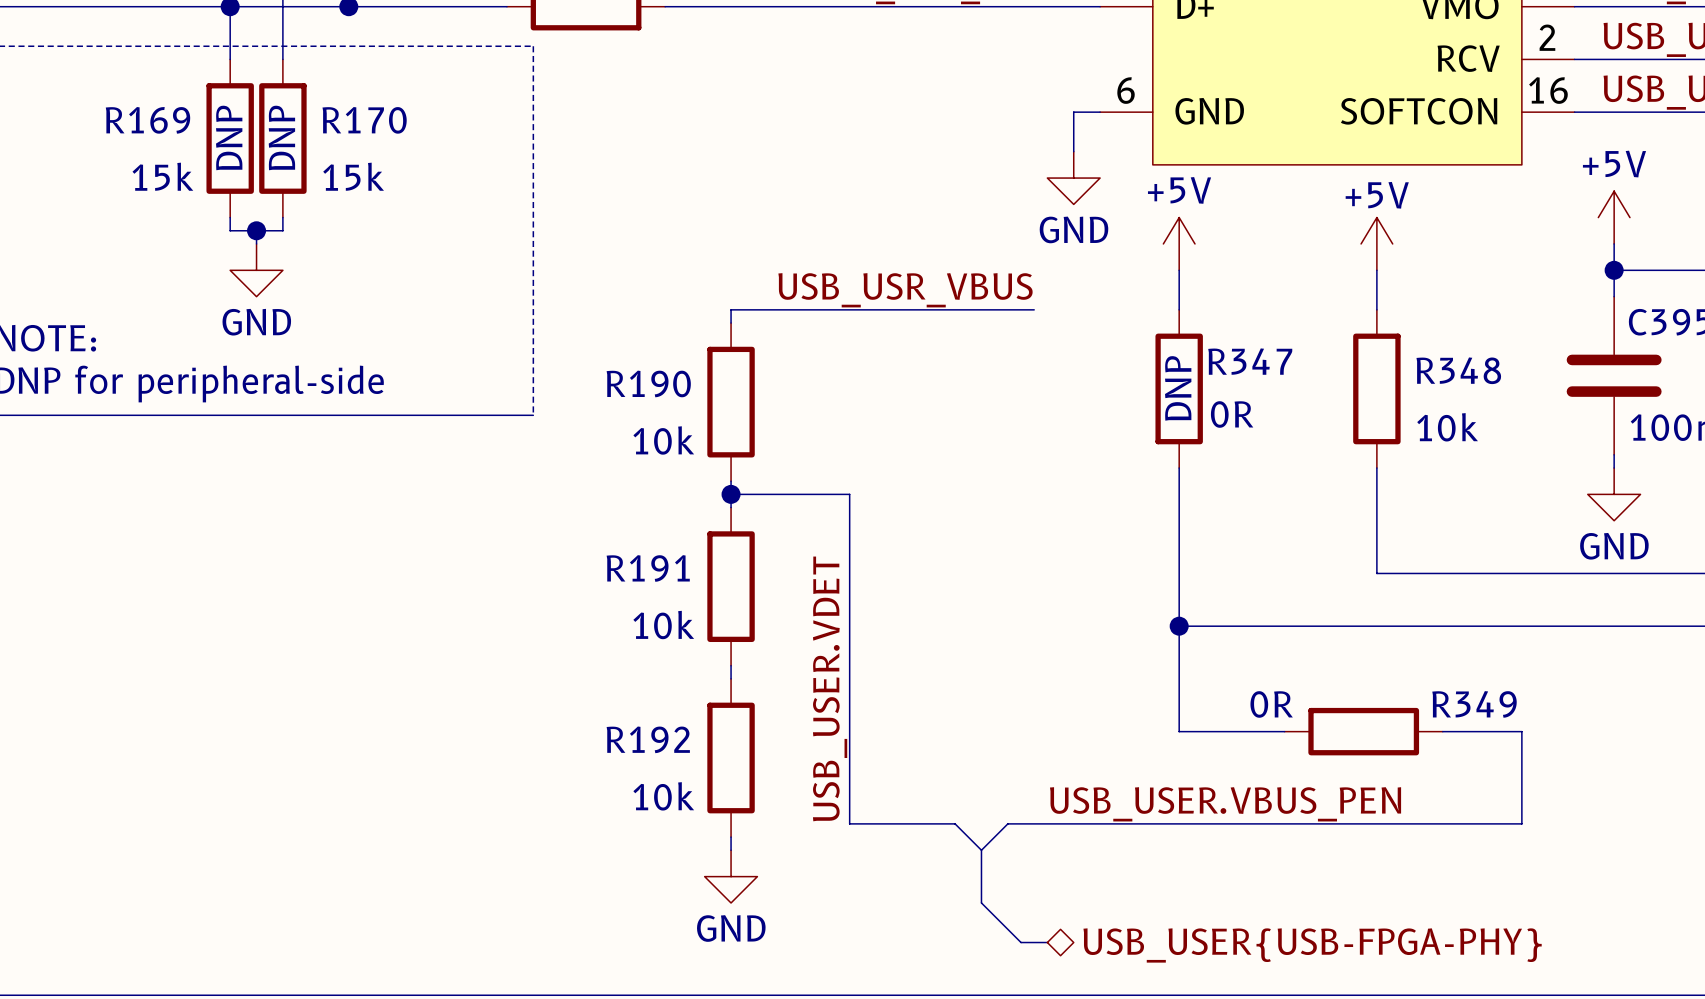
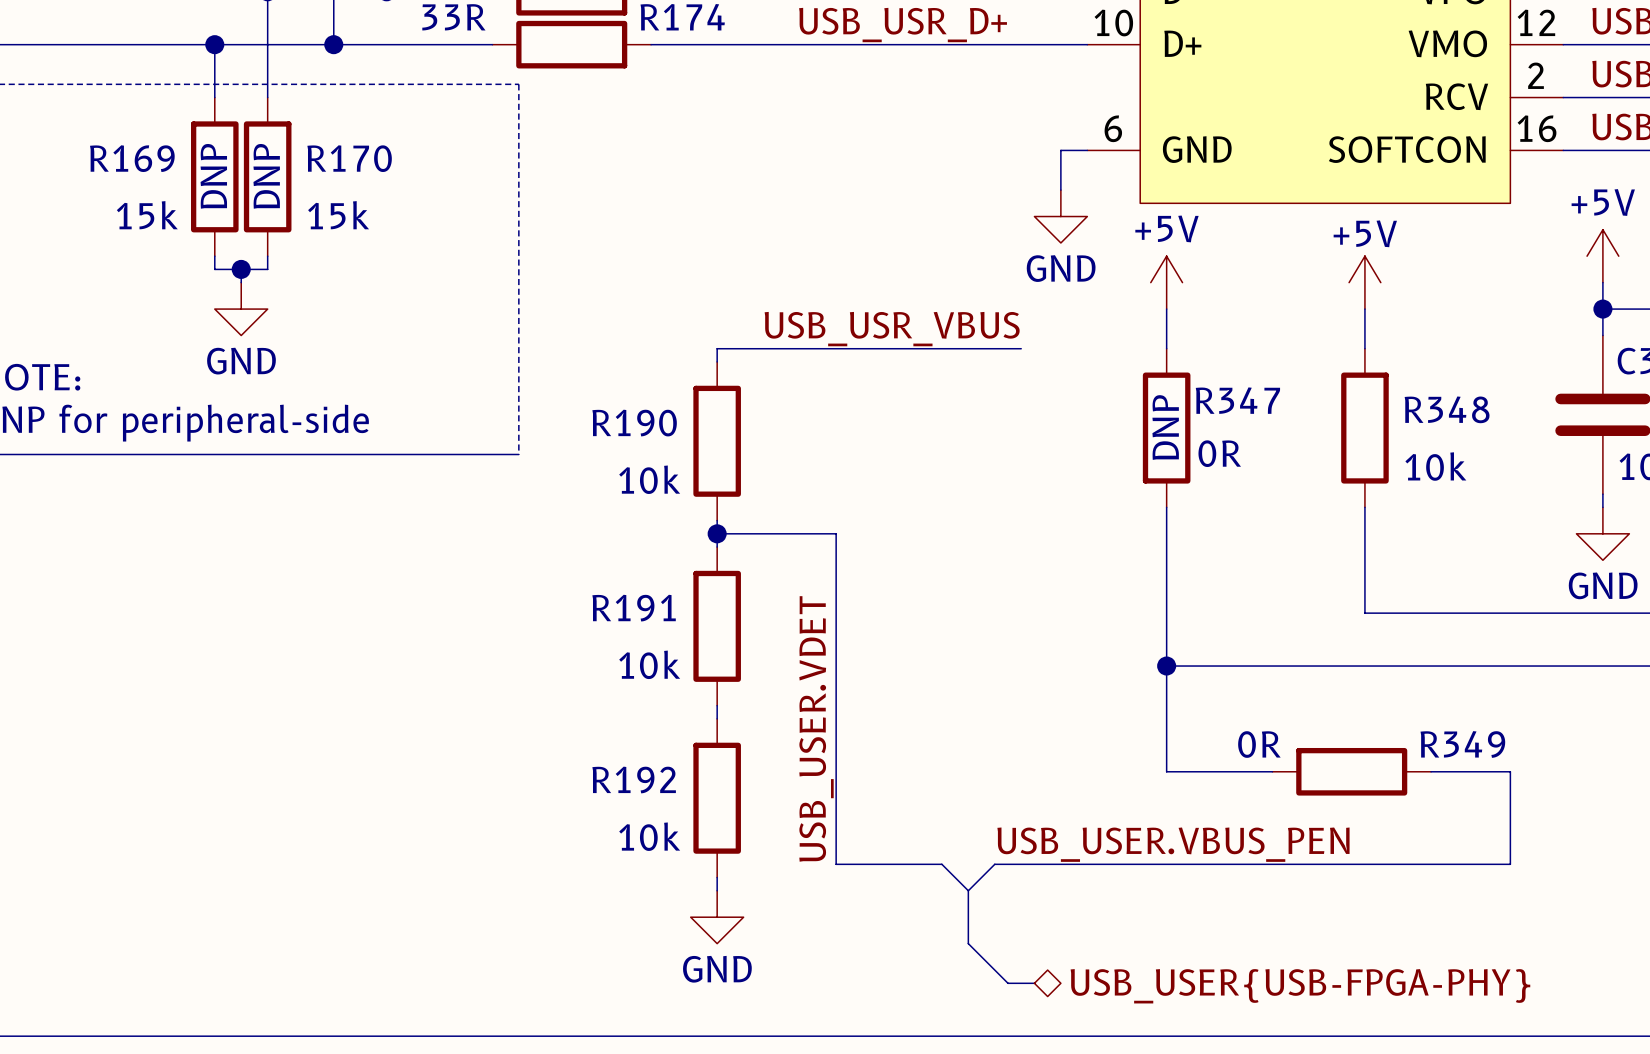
label position: USB_USER.VBUS_PEN (1225, 804) -> USB_USER.VBUS_PEN (1173, 844)

